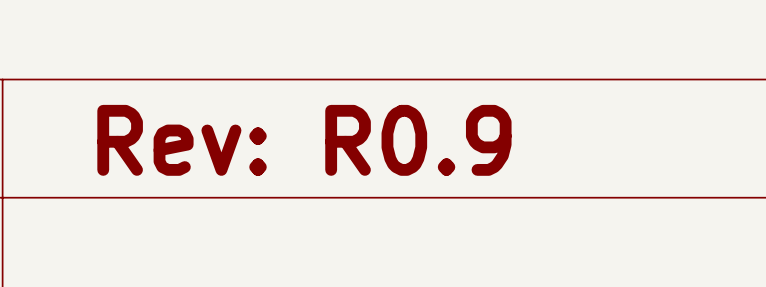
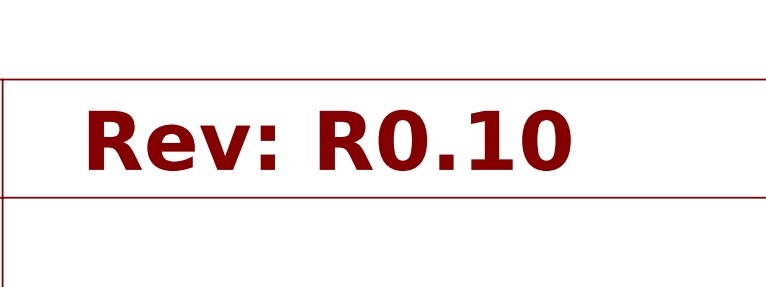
title block: Rev: R0.9 (304, 140) -> Rev: R0.10 (329, 140)

